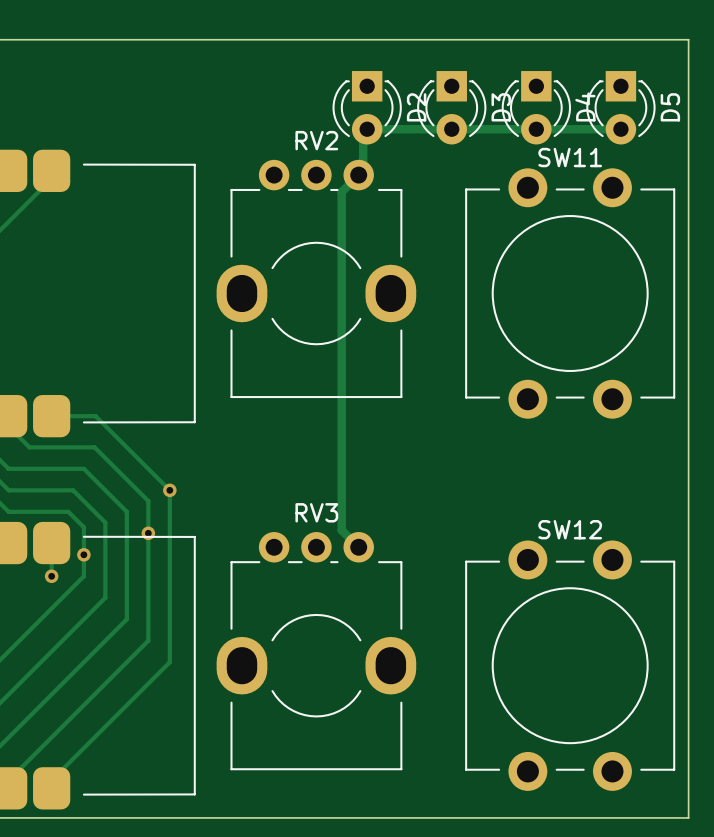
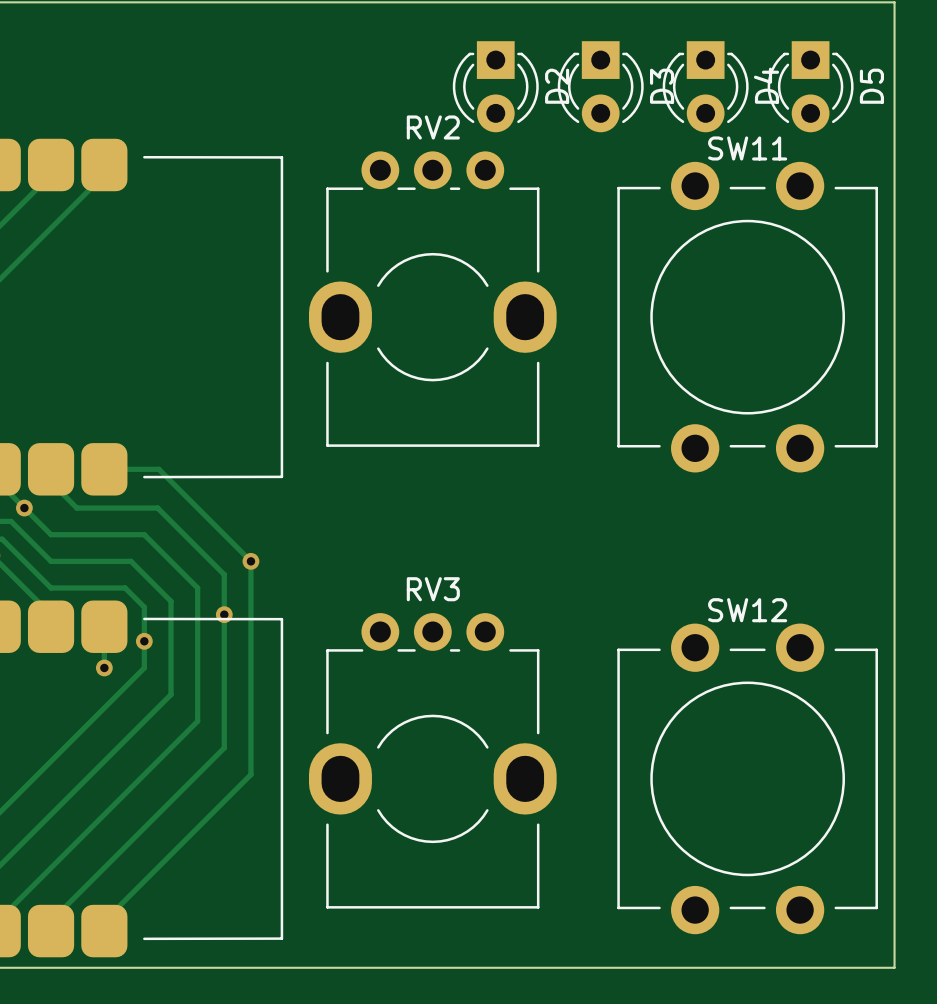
track: (620, 129) (367, 129) (363, 133) (363, 170) (341, 192) (341, 530) (358, 547) -> none

